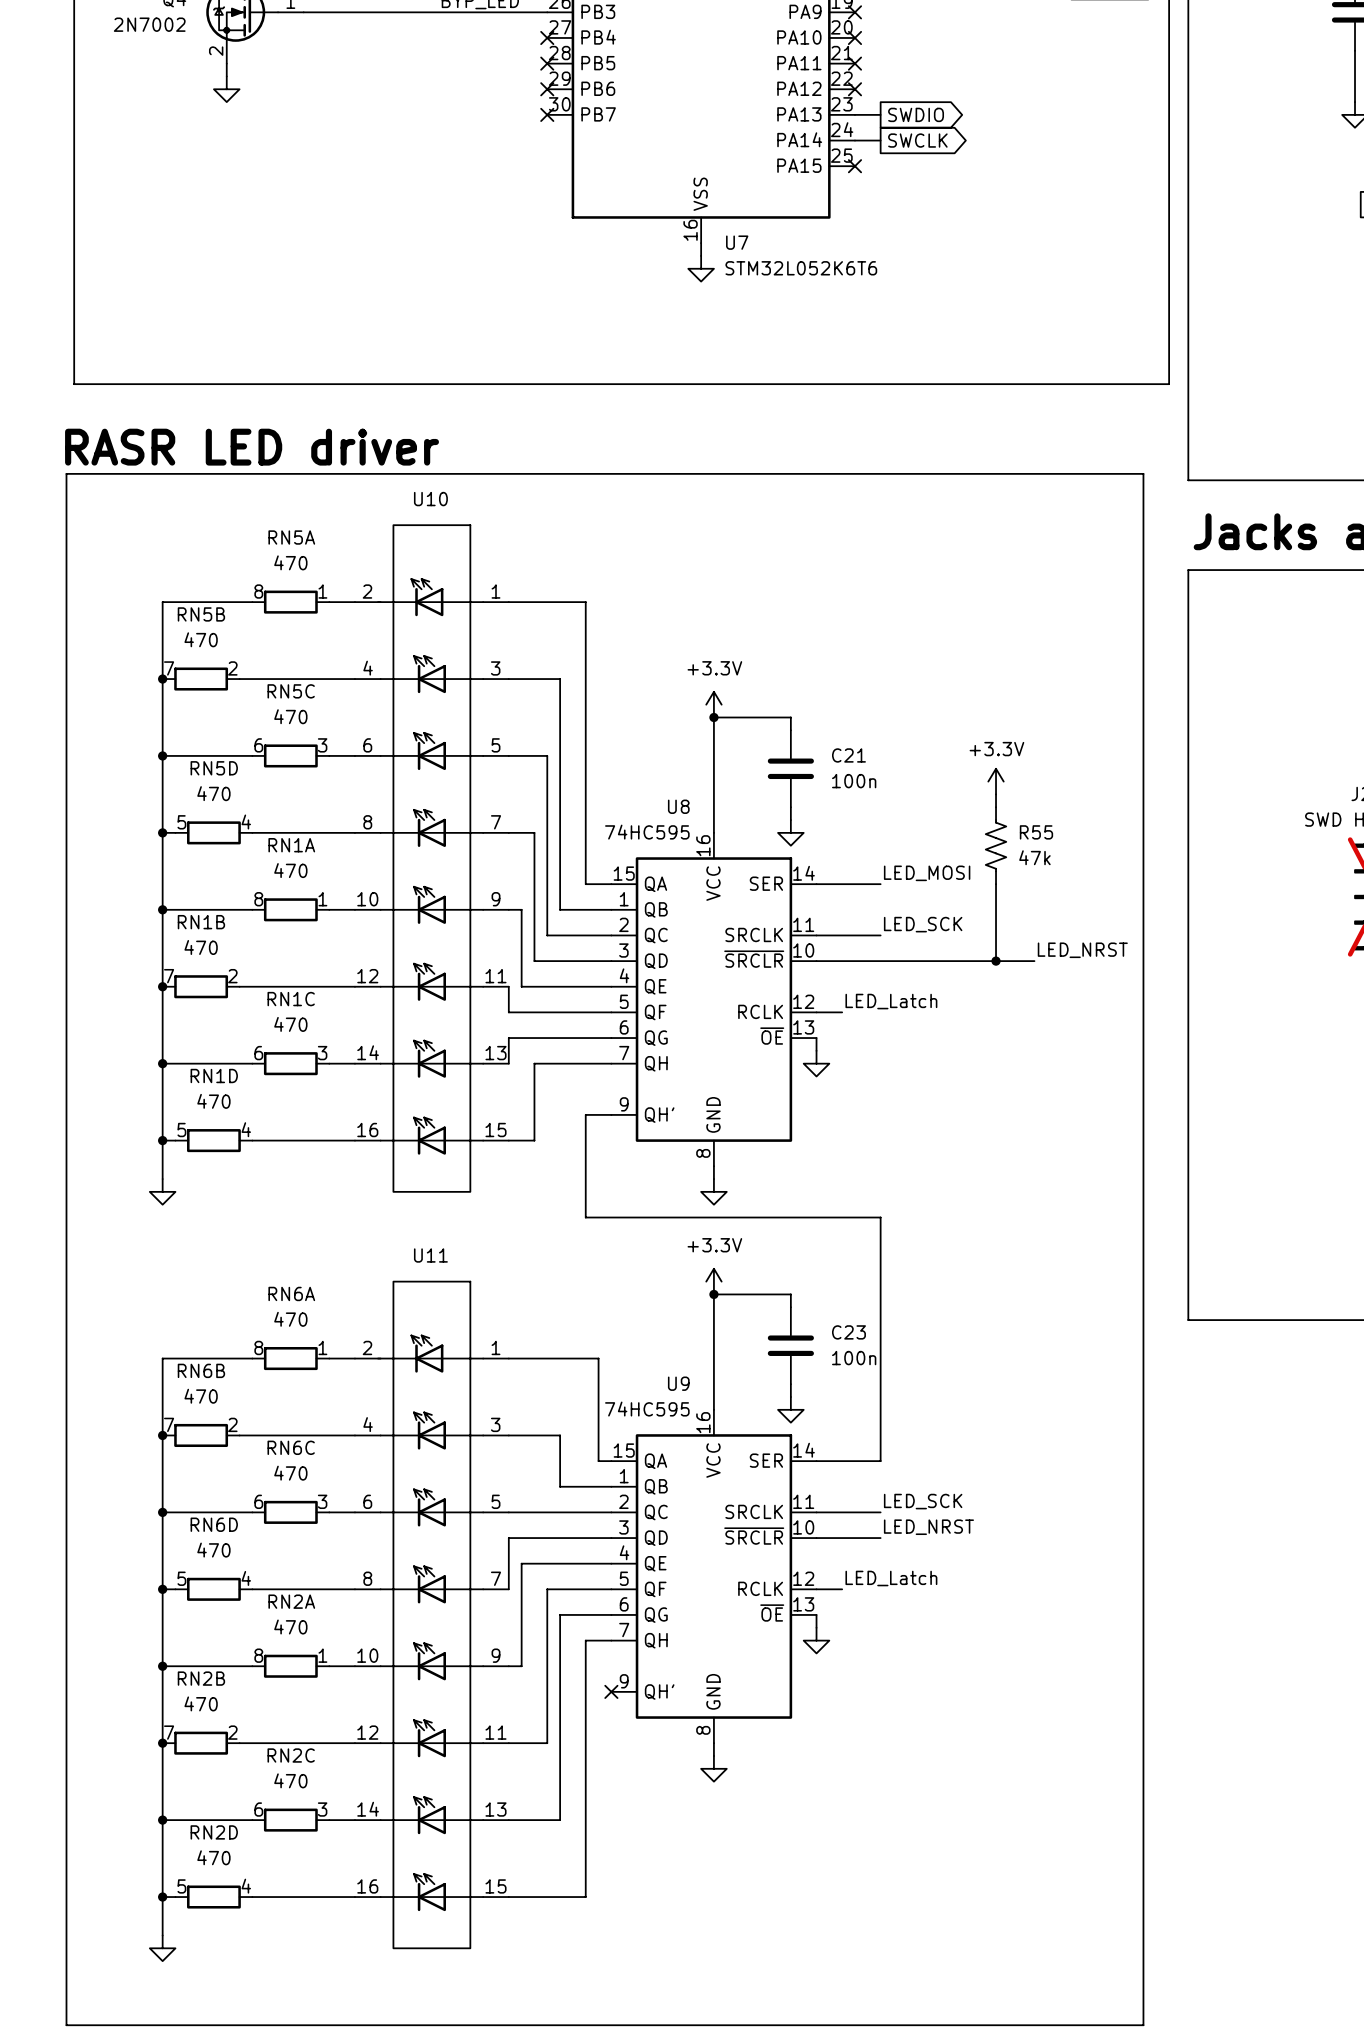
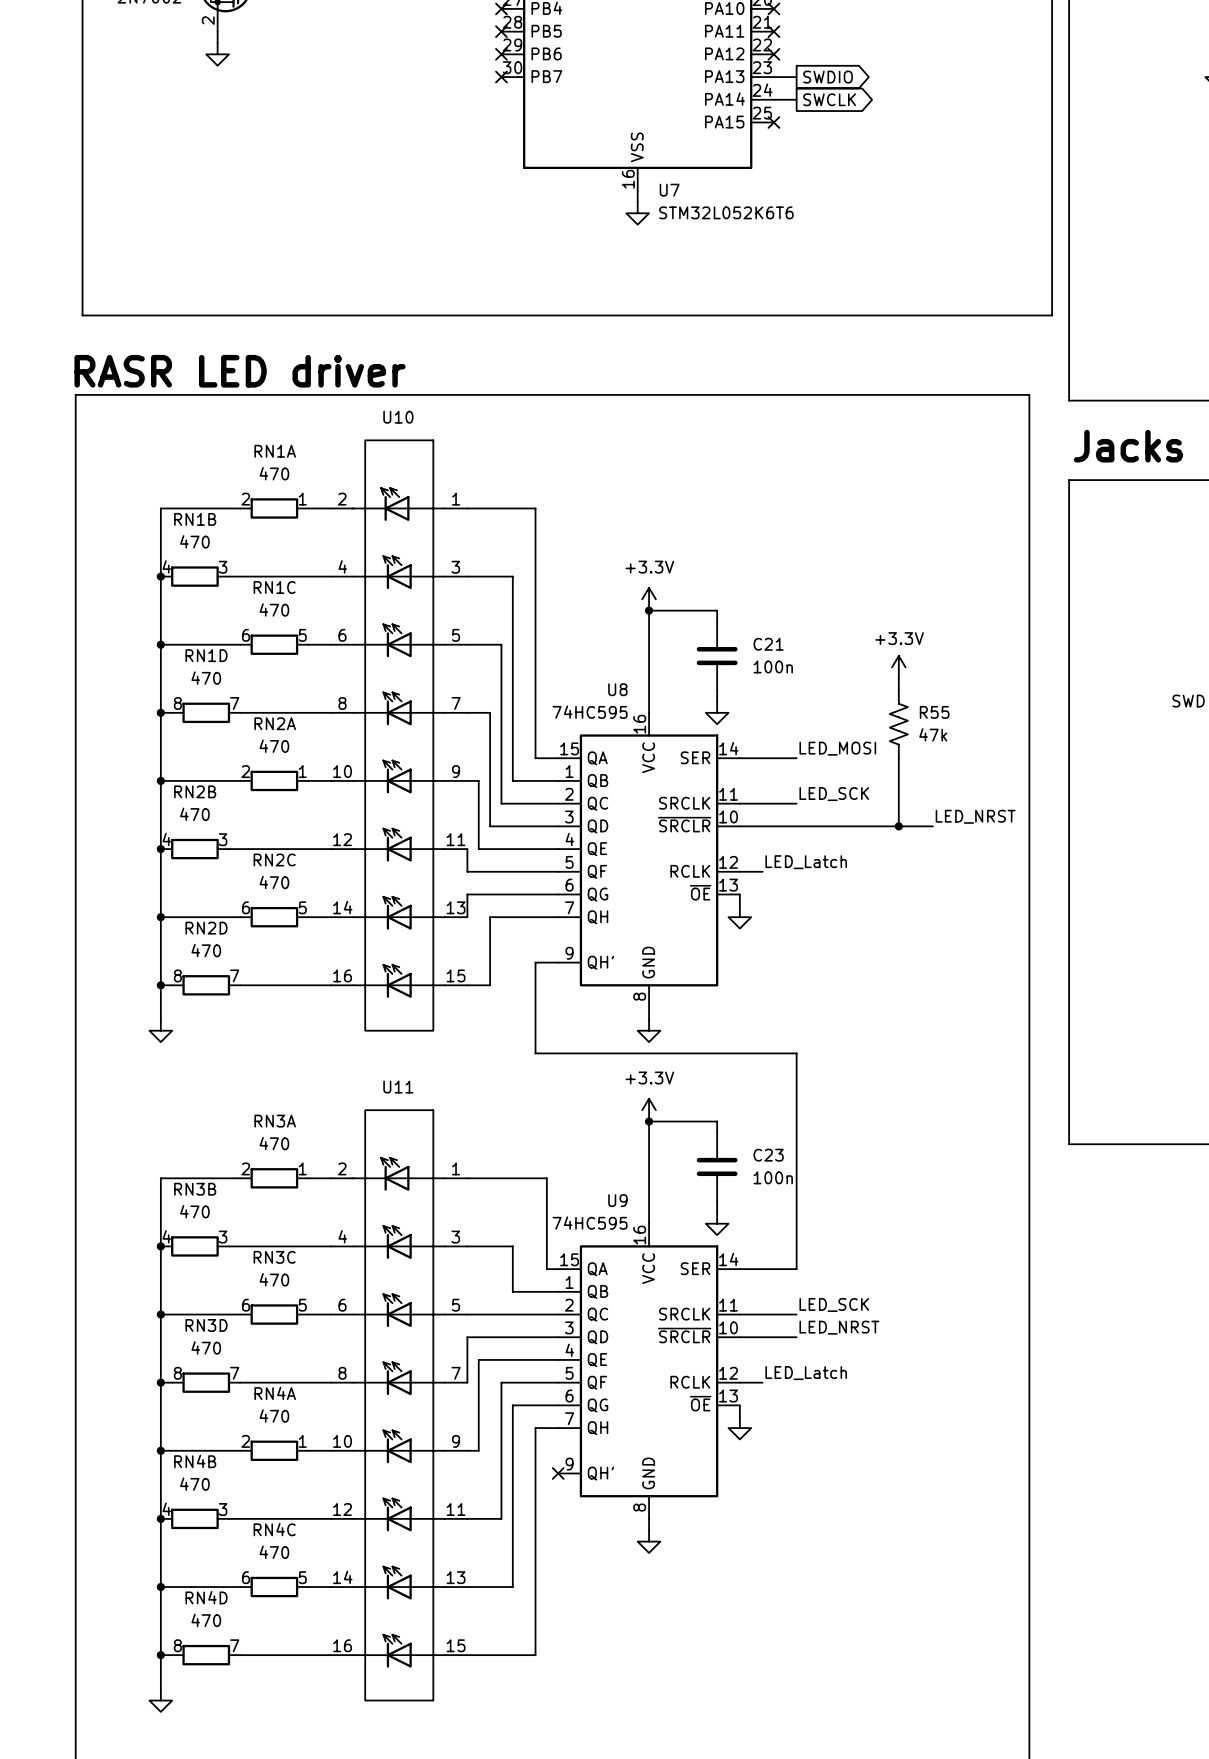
RN5A: 470 (290, 602) -> none
RN5B: 470 (201, 679) -> none
RN5C: 470 (290, 755) -> none
RN5D: 470 (213, 832) -> none
RN1A pin number: 8 (258, 899) -> 2 (245, 499)
RN1A position: (290, 909) -> (274, 508)
RN1B pin number: 7 (169, 976) -> 4 (166, 566)
RN1B pin number: 2 (232, 976) -> 3 (223, 567)
RN1B position: (201, 986) -> (194, 576)
RN1C pin number: 3 (322, 1053) -> 5 (302, 635)
RN1C position: (290, 1063) -> (274, 644)
RN1D pin number: 4 (246, 1129) -> 7 (234, 703)
RN1D pin number: 5 (181, 1130) -> 8 (177, 703)
RN1D position: (213, 1140) -> (206, 712)
RN6A name: RN6A (291, 1293) -> RN3A (275, 1121)
RN6A pin number: 8 (258, 1347) -> 2 (245, 1168)
RN6B name: RN6B (201, 1370) -> RN3B (195, 1189)
RN6B pin number: 7 (169, 1424) -> 4 (166, 1236)
RN6B pin number: 2 (232, 1424) -> 3 (223, 1237)
RN6C name: RN6C (291, 1447) -> RN3C (274, 1257)
RN6C pin number: 3 (322, 1501) -> 5 (302, 1305)
RN6D name: RN6D (214, 1524) -> RN3D (206, 1325)
RN6D pin number: 5 (181, 1578) -> 8 (177, 1373)
RN6D pin number: 4 (246, 1578) -> 7 (234, 1373)
RN2A pin number: 8 (258, 1655) -> 2 (245, 771)
RN2A position: (290, 1666) -> (274, 780)
RN4A: none -> 470 (274, 1450)
RN2B pin number: 7 (169, 1732) -> 4 (166, 839)
RN2B pin number: 2 (232, 1732) -> 3 (223, 839)
RN2B position: (201, 1743) -> (194, 849)
RN4B: none -> 470 (194, 1518)
RN2C pin number: 3 (322, 1809) -> 5 (302, 907)
RN2C position: (290, 1820) -> (274, 917)
RN4C: none -> 470 (274, 1587)
RN2D pin number: 5 (181, 1886) -> 8 (177, 975)
RN2D pin number: 4 (246, 1886) -> 7 (234, 975)
RN2D position: (213, 1897) -> (206, 985)
RN4D: none -> 470 (206, 1655)

